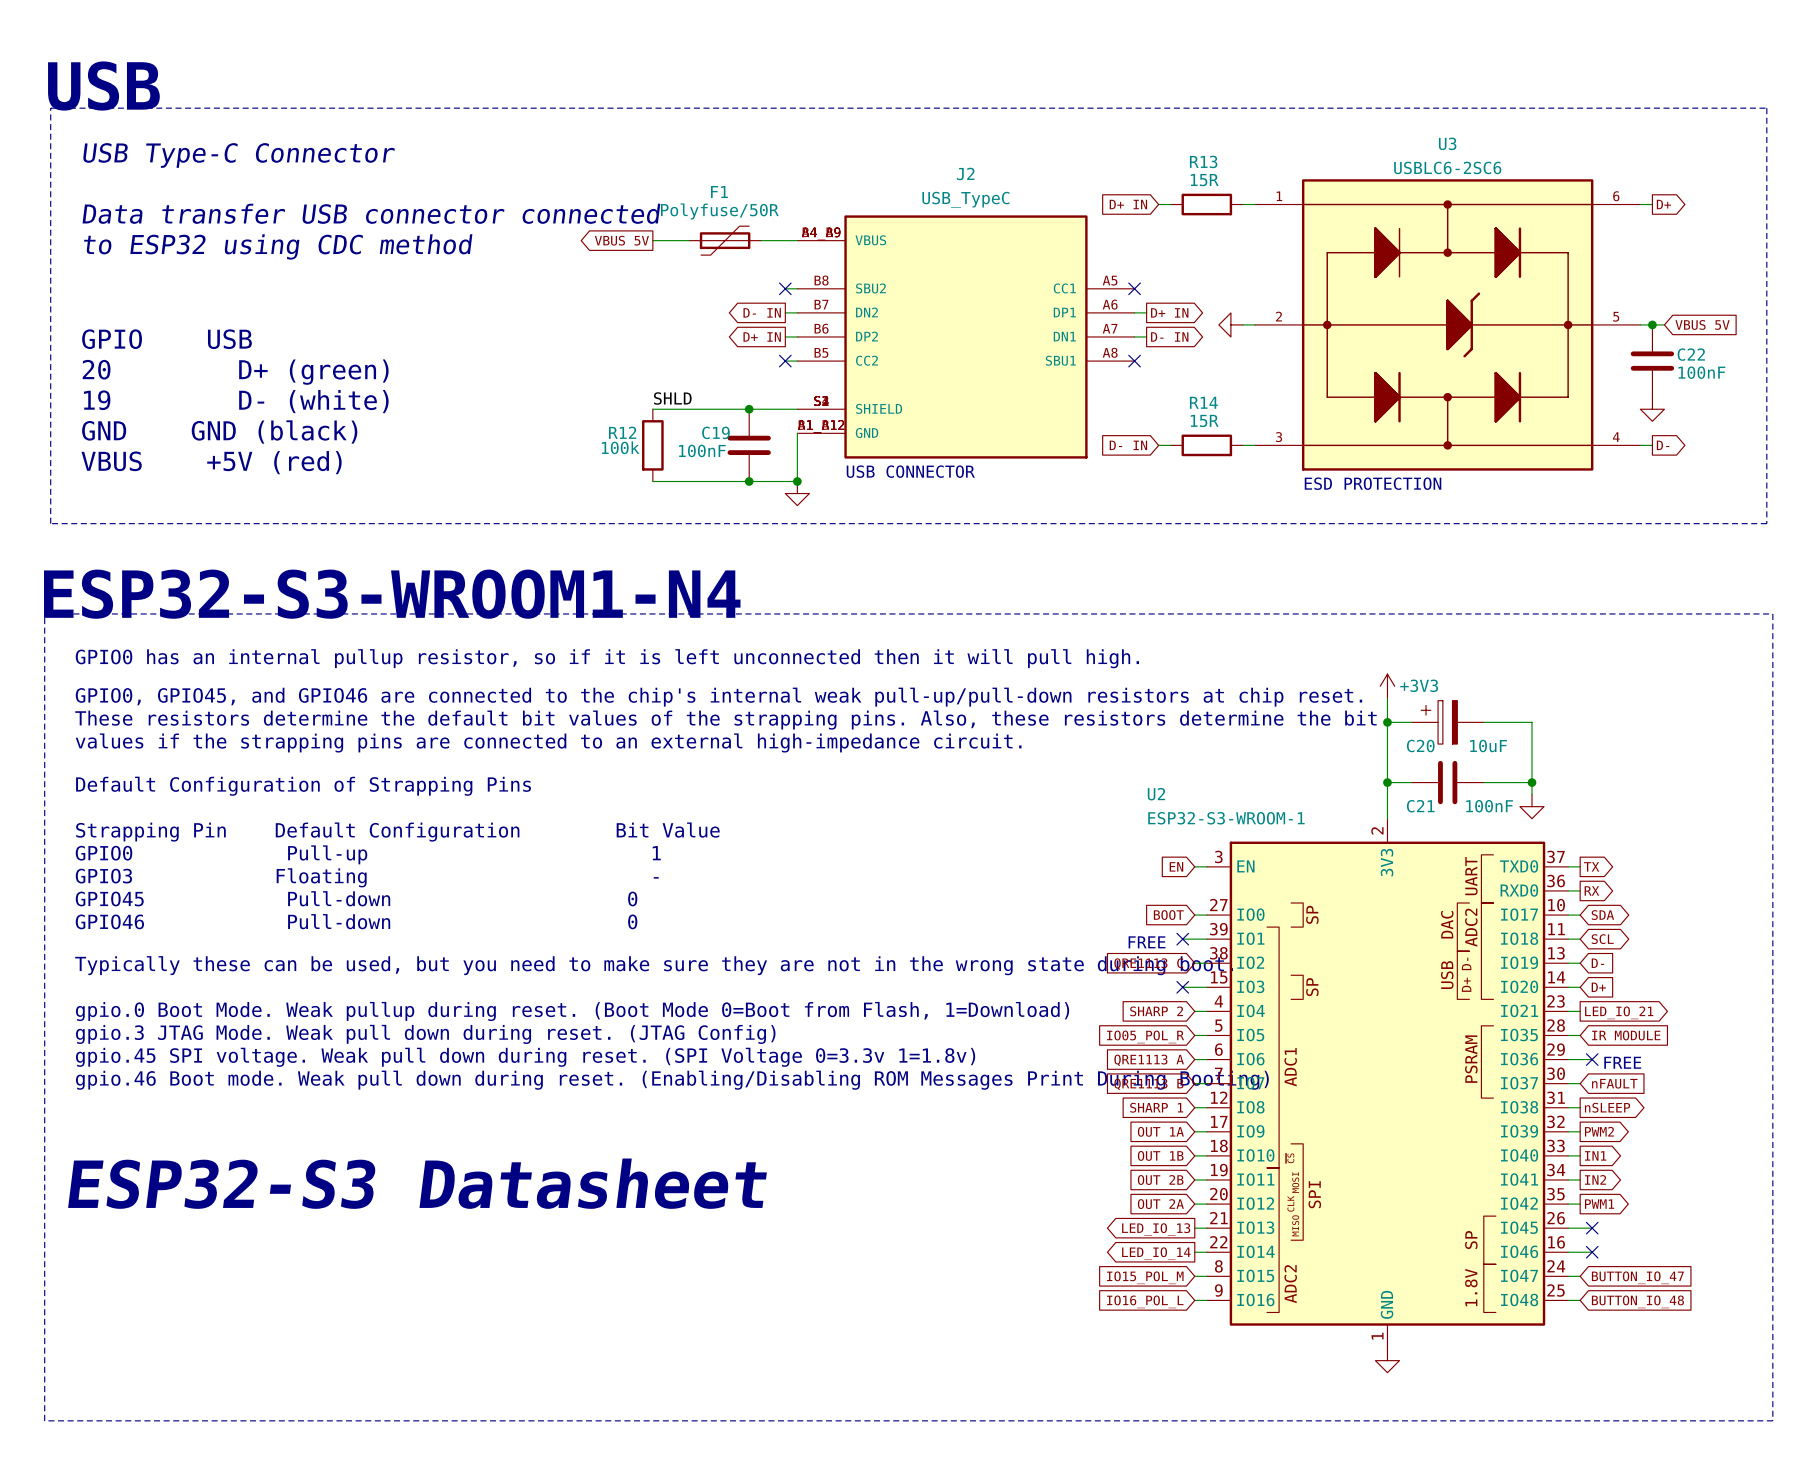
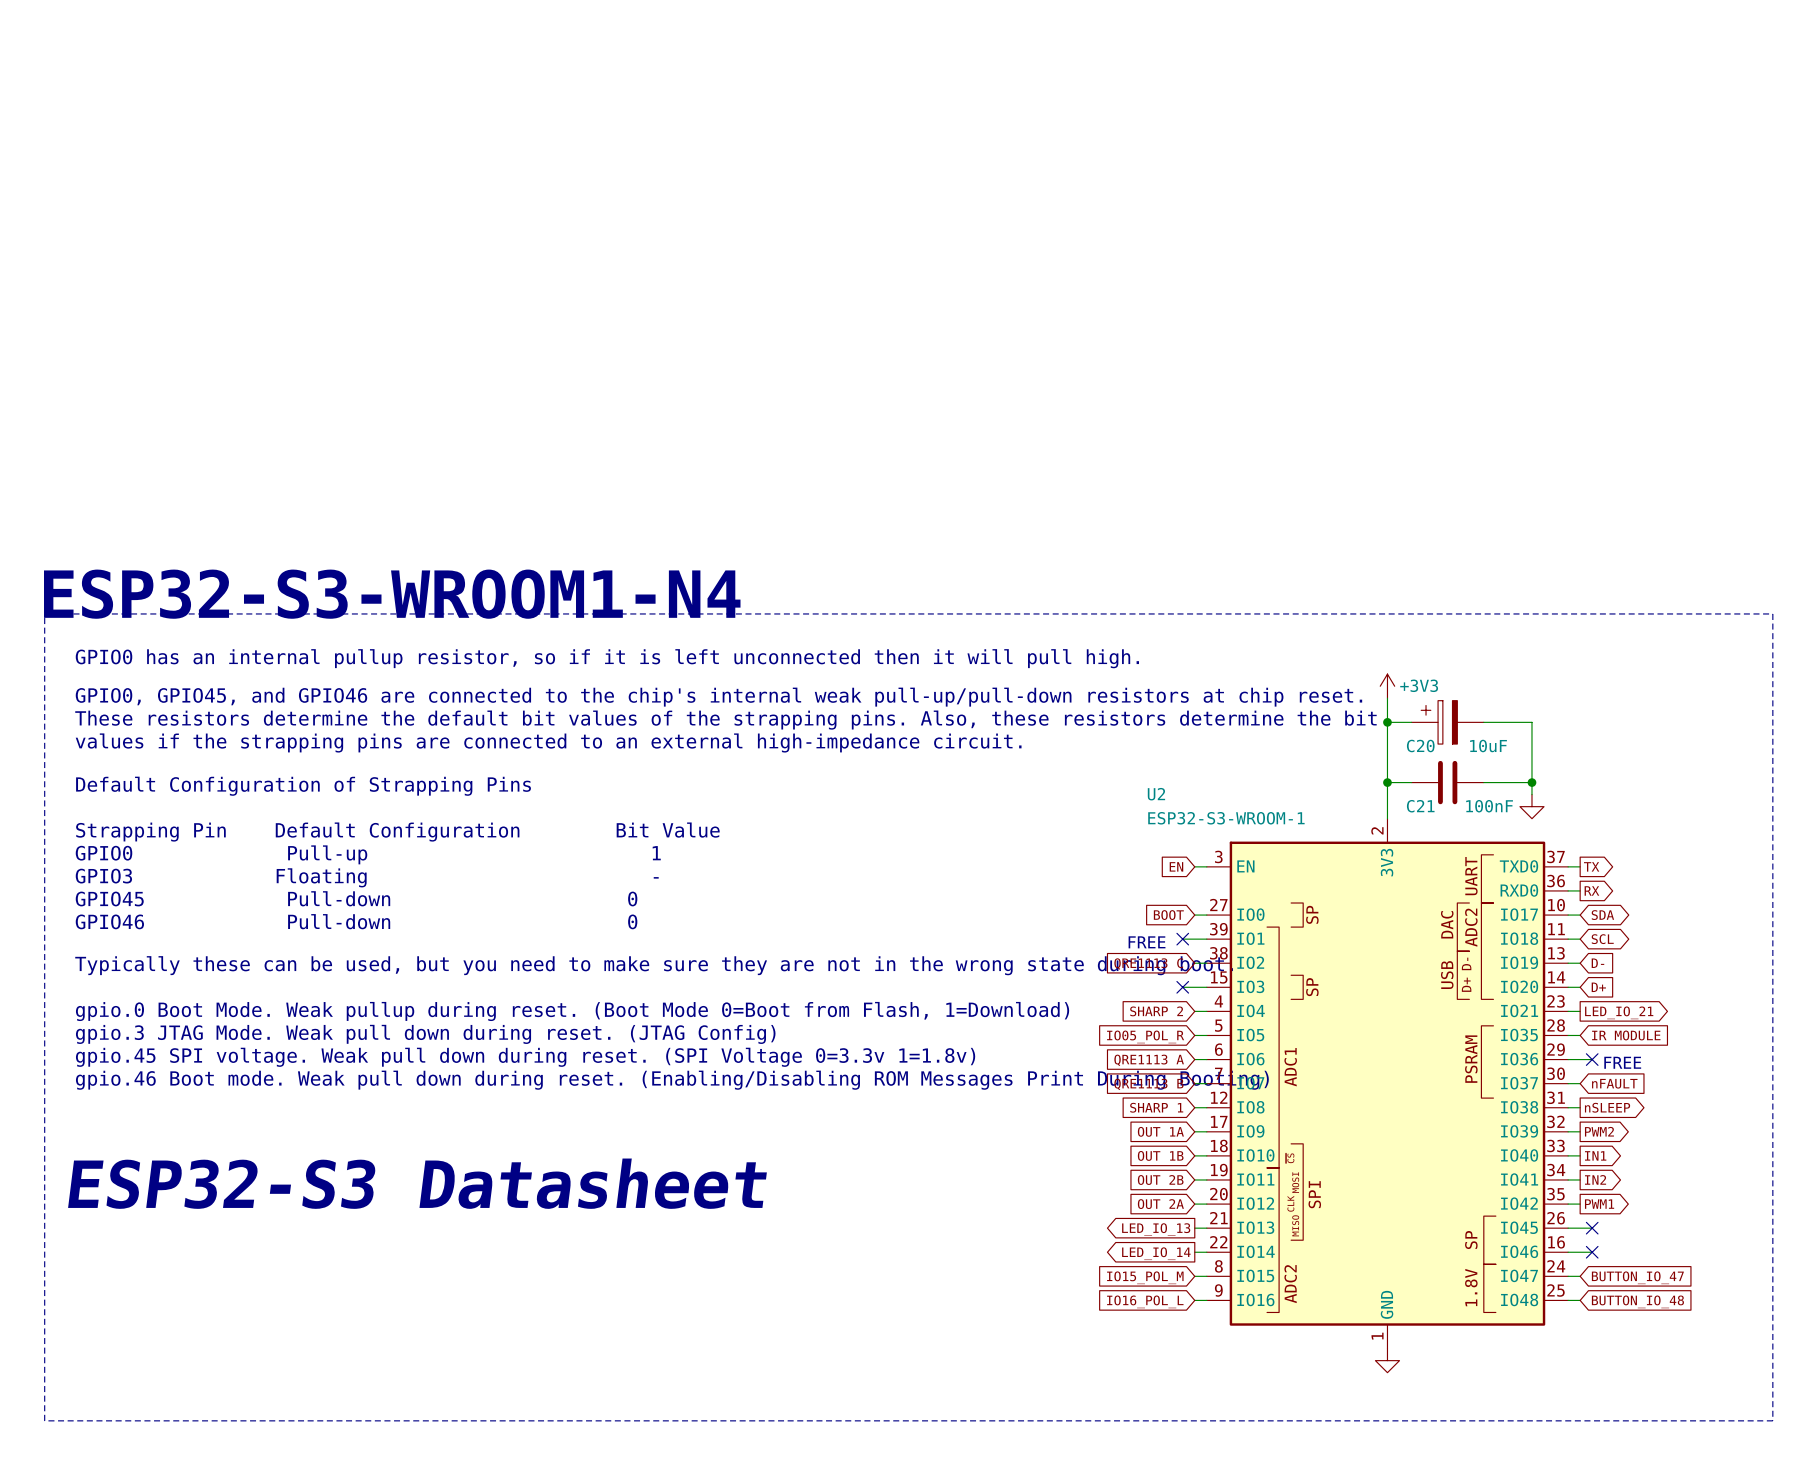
text: USB (103, 86) -> none
line: (50, 108) (1766, 108) (1766, 523) (50, 523) (50, 108) -> none
text: USB Type-C Connector (238, 155) -> none
global label: D+ IN (1128, 204) -> none
wire: (1158, 204) (1170, 204) -> none
R13: 15R (1206, 204) -> none
wire: (1242, 204) (1255, 204) -> none
wire: (1640, 204) (1652, 204) -> none
global label: D+ (1663, 204) -> none
text: Data transfer USB connector connected (371, 213) -> none
global label: VBUS 5V (621, 240) -> none
wire: (652, 240) (688, 240) -> none
F1: Polyfuse/50R (725, 240) -> none
wire: (761, 240) (797, 240) -> none
text: to ESP32 using CDC method (278, 246) -> none
wire: (785, 288) (797, 288) -> none
no-connect mark: (785, 288) -> none
no-connect mark: (1134, 288) -> none
global label: D- IN (762, 312) -> none
wire: (785, 312) (797, 312) -> none
wire: (1134, 312) (1146, 312) -> none
global label: D+ IN (1169, 312) -> none
power symbol: (1230, 324) -> none
wire: (1242, 324) (1255, 324) -> none
U3: USBLC6-2SC6 (1447, 324) -> none
wire: (1640, 324) (1664, 324) -> none
junction: (1652, 324) -> none
global label: VBUS 5V (1702, 324) -> none
global label: D+ IN (762, 336) -> none
wire: (785, 336) (797, 336) -> none
J2: USB_TypeC (965, 336) -> none
wire: (1134, 336) (1146, 336) -> none
global label: D- IN (1169, 336) -> none
text: GPIO USB (166, 339) -> none
wire: (785, 361) (797, 361) -> none
no-connect mark: (785, 361) -> none
no-connect mark: (1134, 361) -> none
C22: 100nF (1652, 361) -> none
text: 20 D+ (green) (235, 372) -> none
label: SHLD (672, 398) -> none
text: 19 D- (white) (236, 401) -> none
wire: (652, 409) (797, 409) -> none
junction: (749, 409) -> none
power symbol: (1652, 409) -> none
text: GND GND (black) (219, 432) -> none
wire: (797, 433) (797, 481) (652, 481) -> none
R12: 100k (652, 445) -> none
C19: 100nF (749, 445) -> none
global label: D- IN (1128, 445) -> none
wire: (1158, 445) (1170, 445) -> none
R14: 15R (1206, 445) -> none
wire: (1242, 445) (1255, 445) -> none
wire: (1640, 445) (1652, 445) -> none
global label: D- (1663, 445) -> none
text: VBUS +5V (red) (211, 462) -> none
text: USB CONNECTOR (910, 471) -> none
junction: (749, 481) -> none
junction: (797, 481) -> none
text: ESD PROTECTION (1373, 483) -> none
power symbol: (797, 493) -> none

